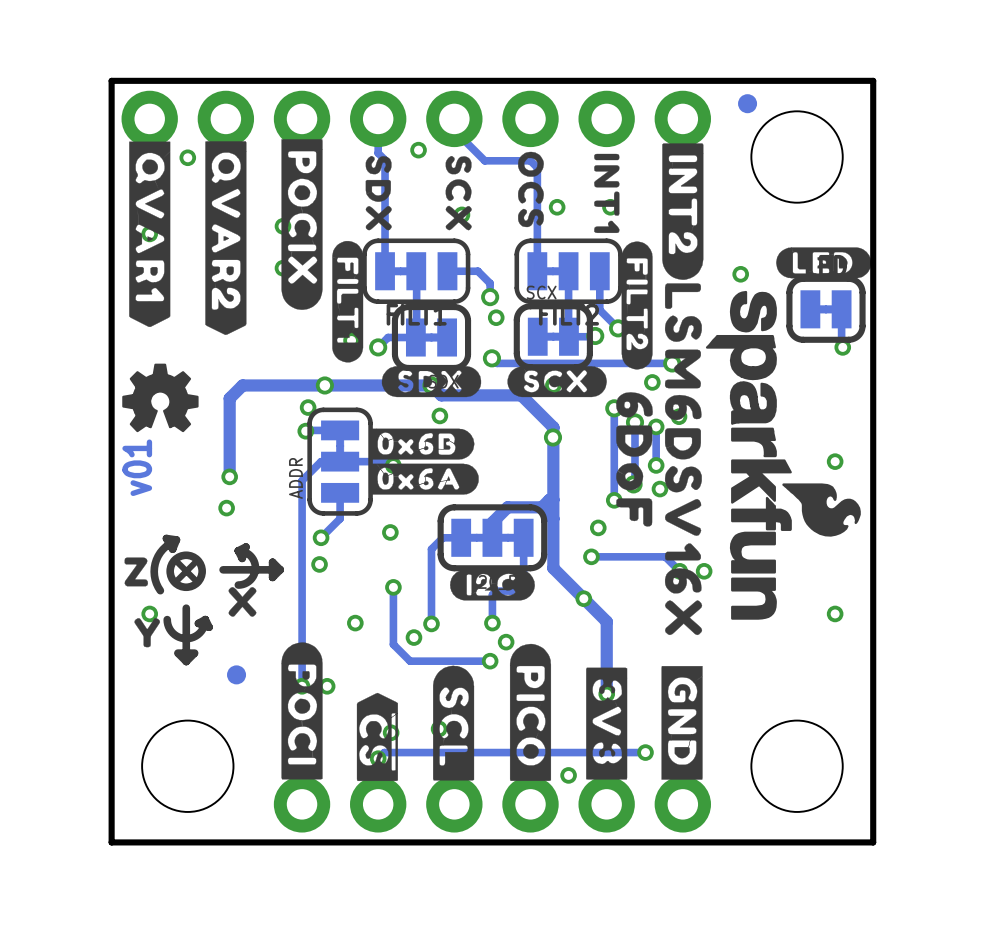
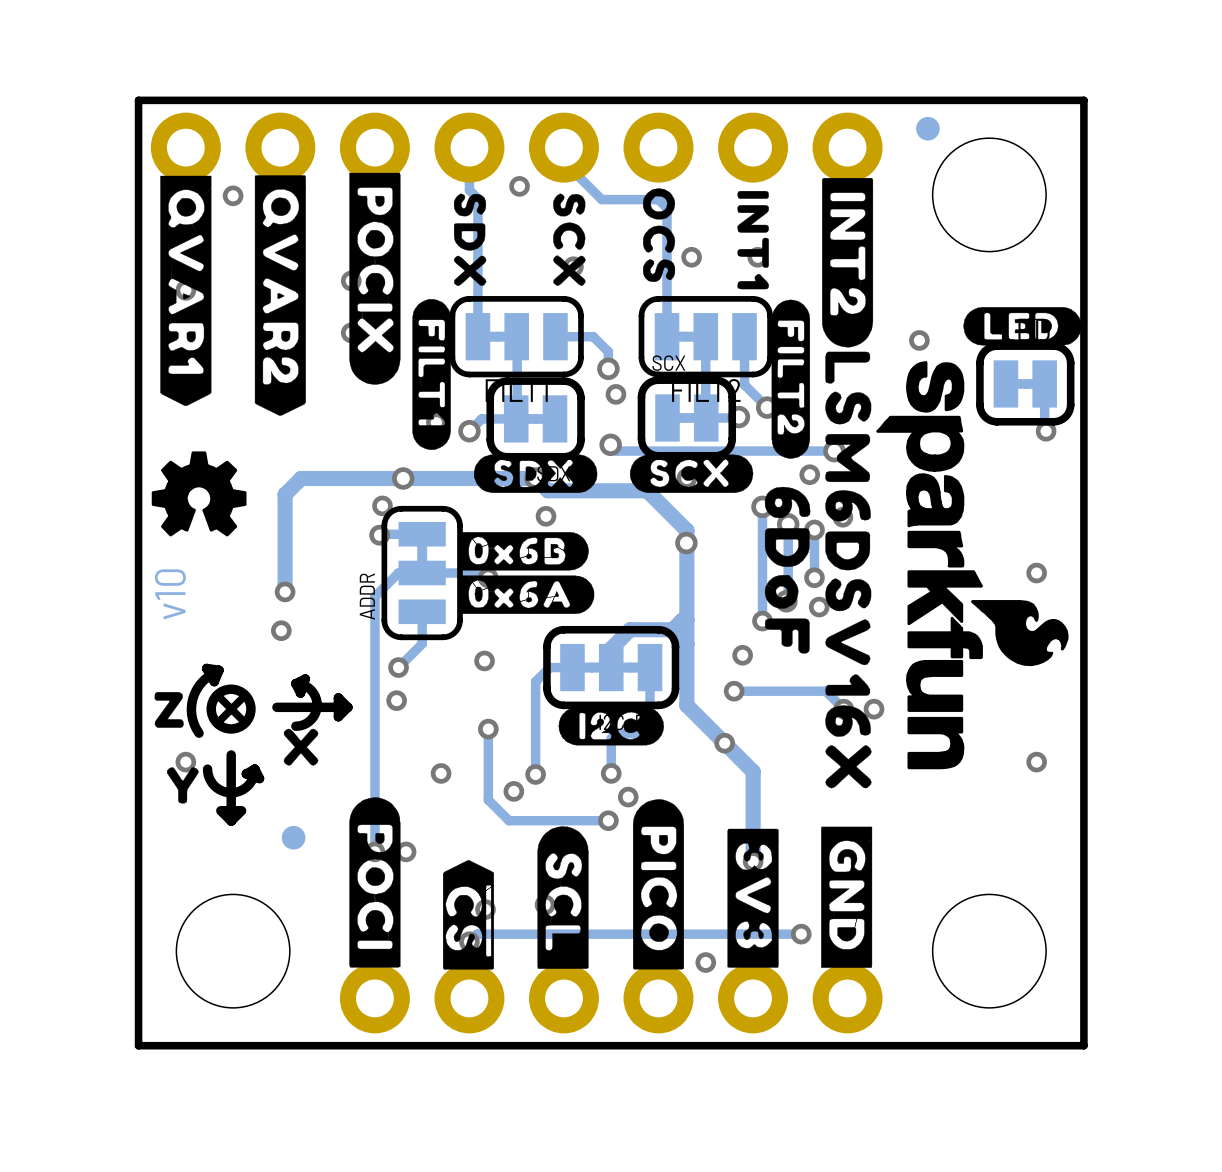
text: v01 (137, 467) -> v10 (170, 594)

